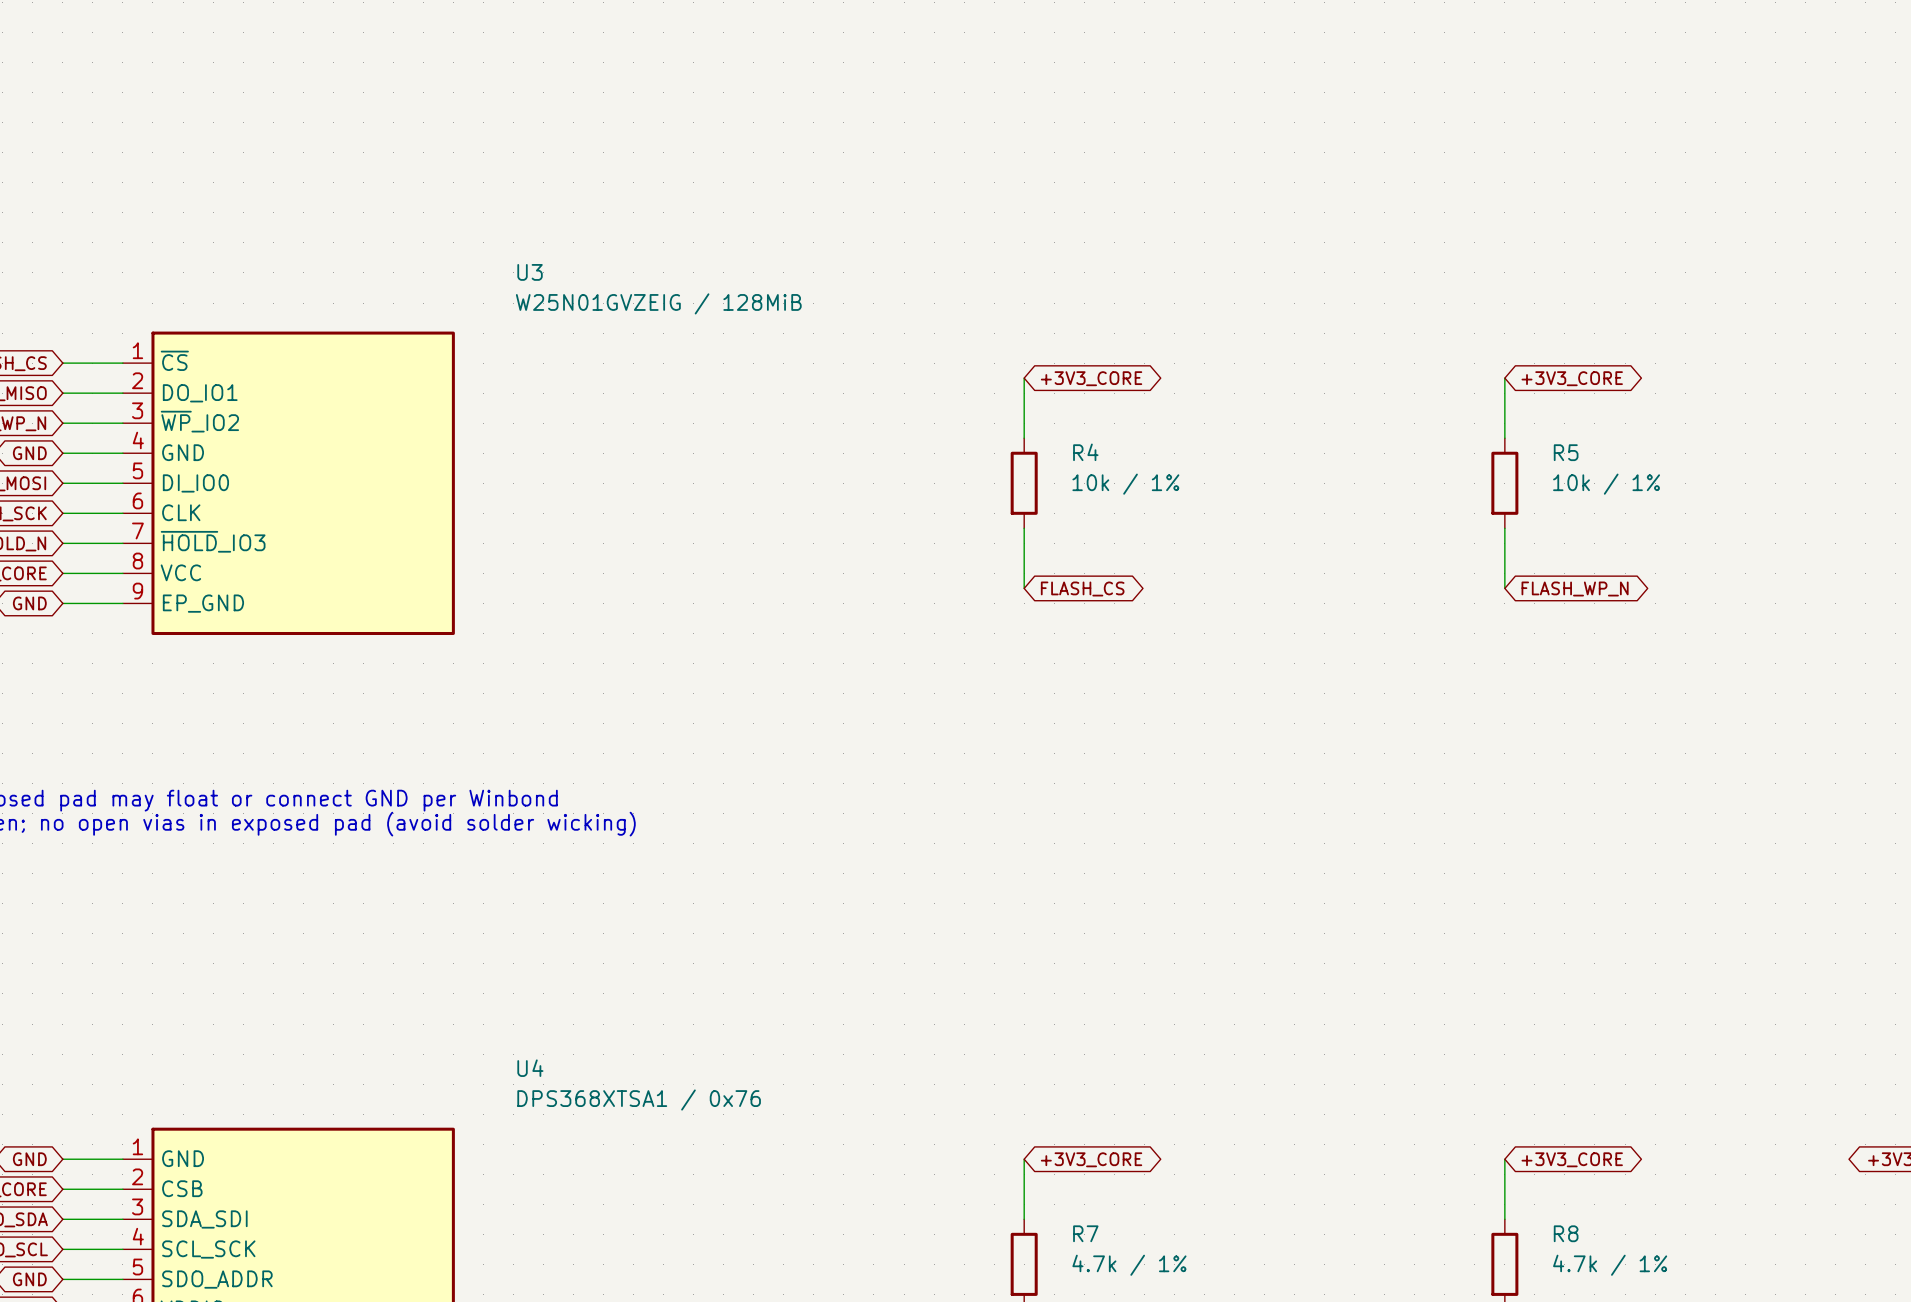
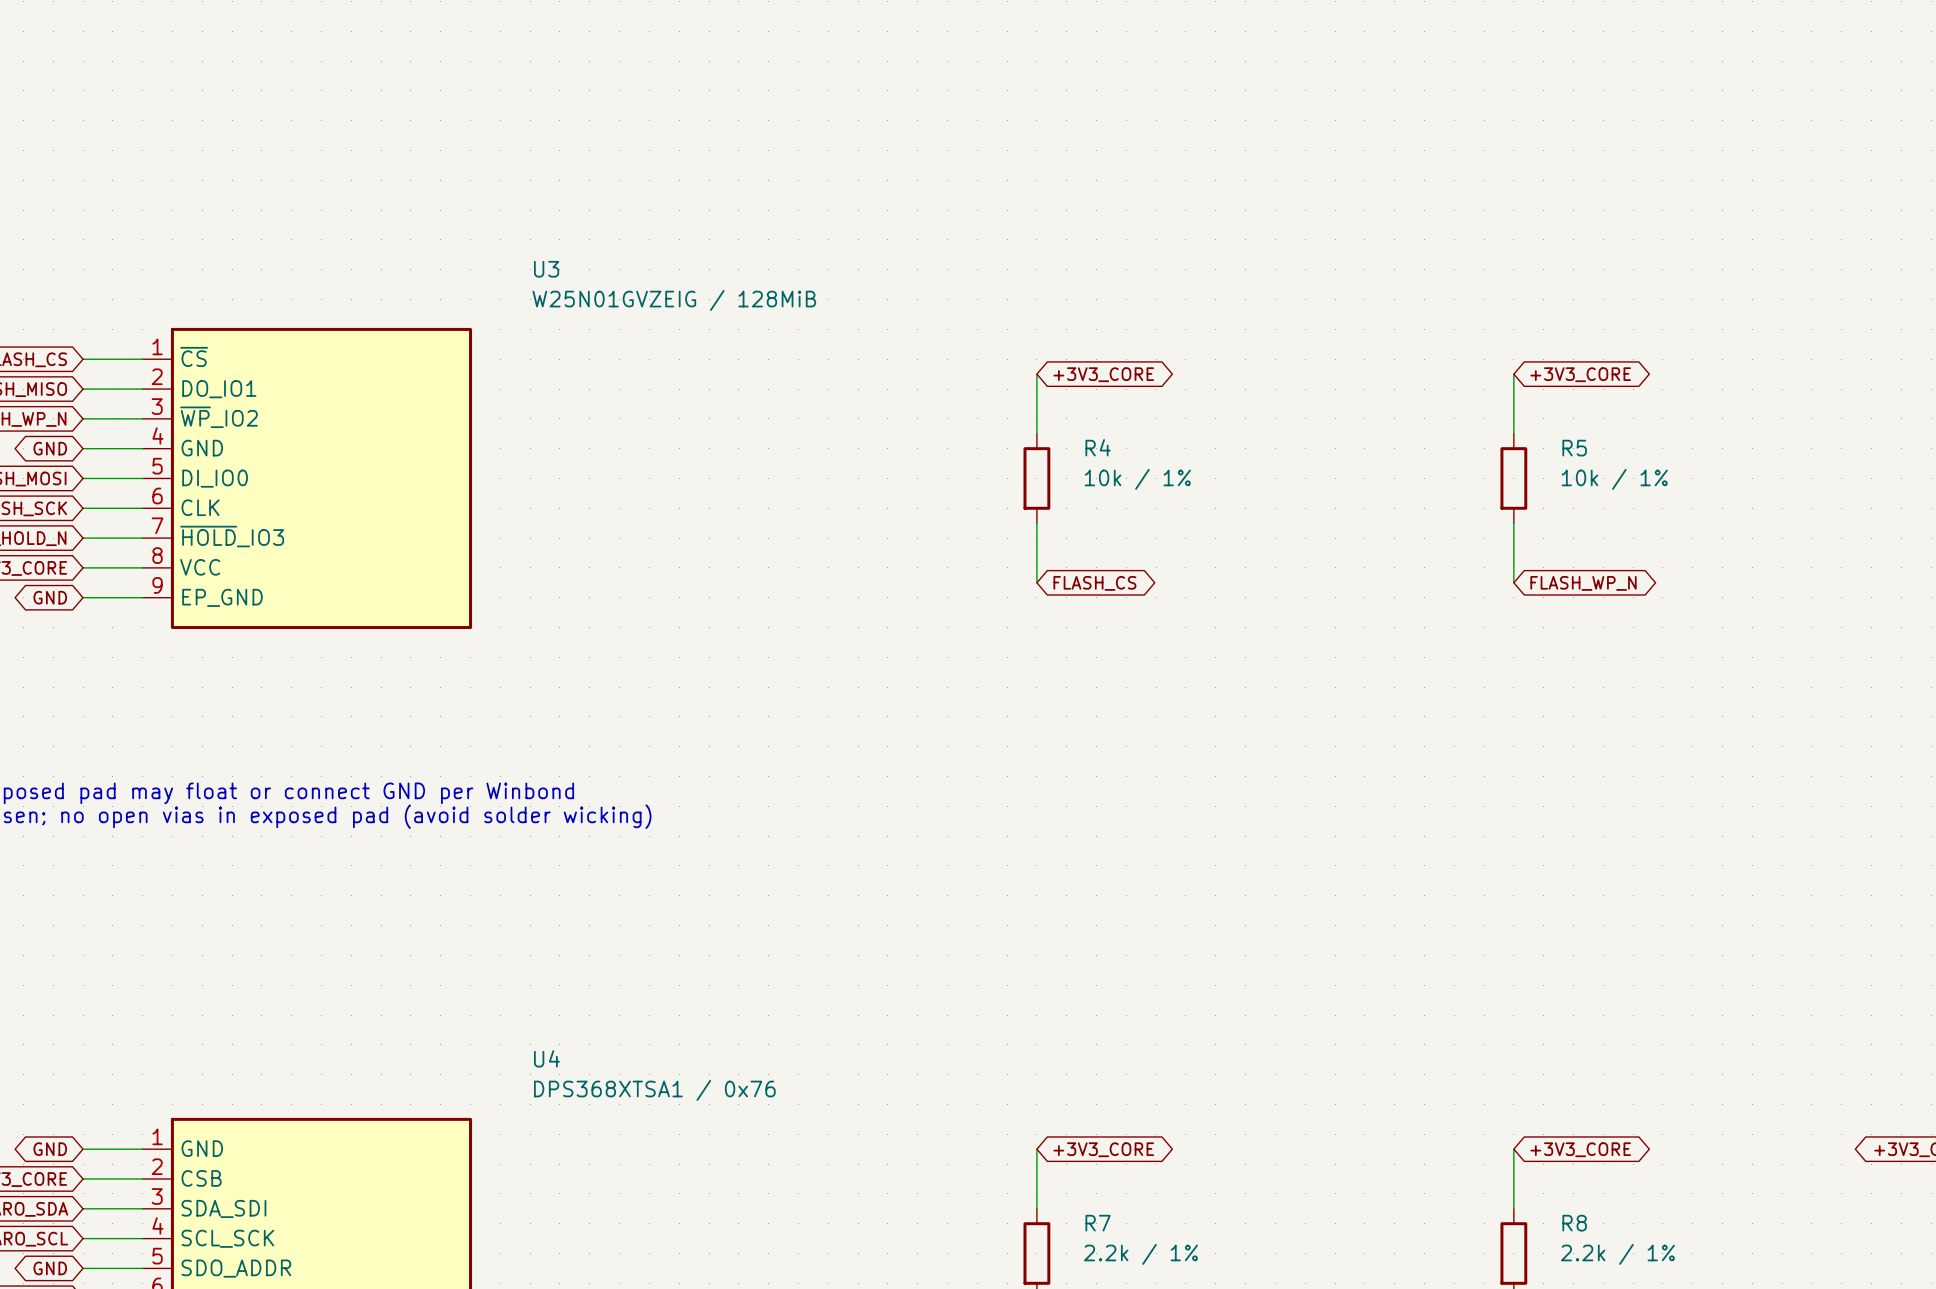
R7 value: 4.7k / 1% (1129, 1265) -> 2.2k / 1% (1141, 1254)
R8 value: 4.7k / 1% (1610, 1265) -> 2.2k / 1% (1617, 1254)

